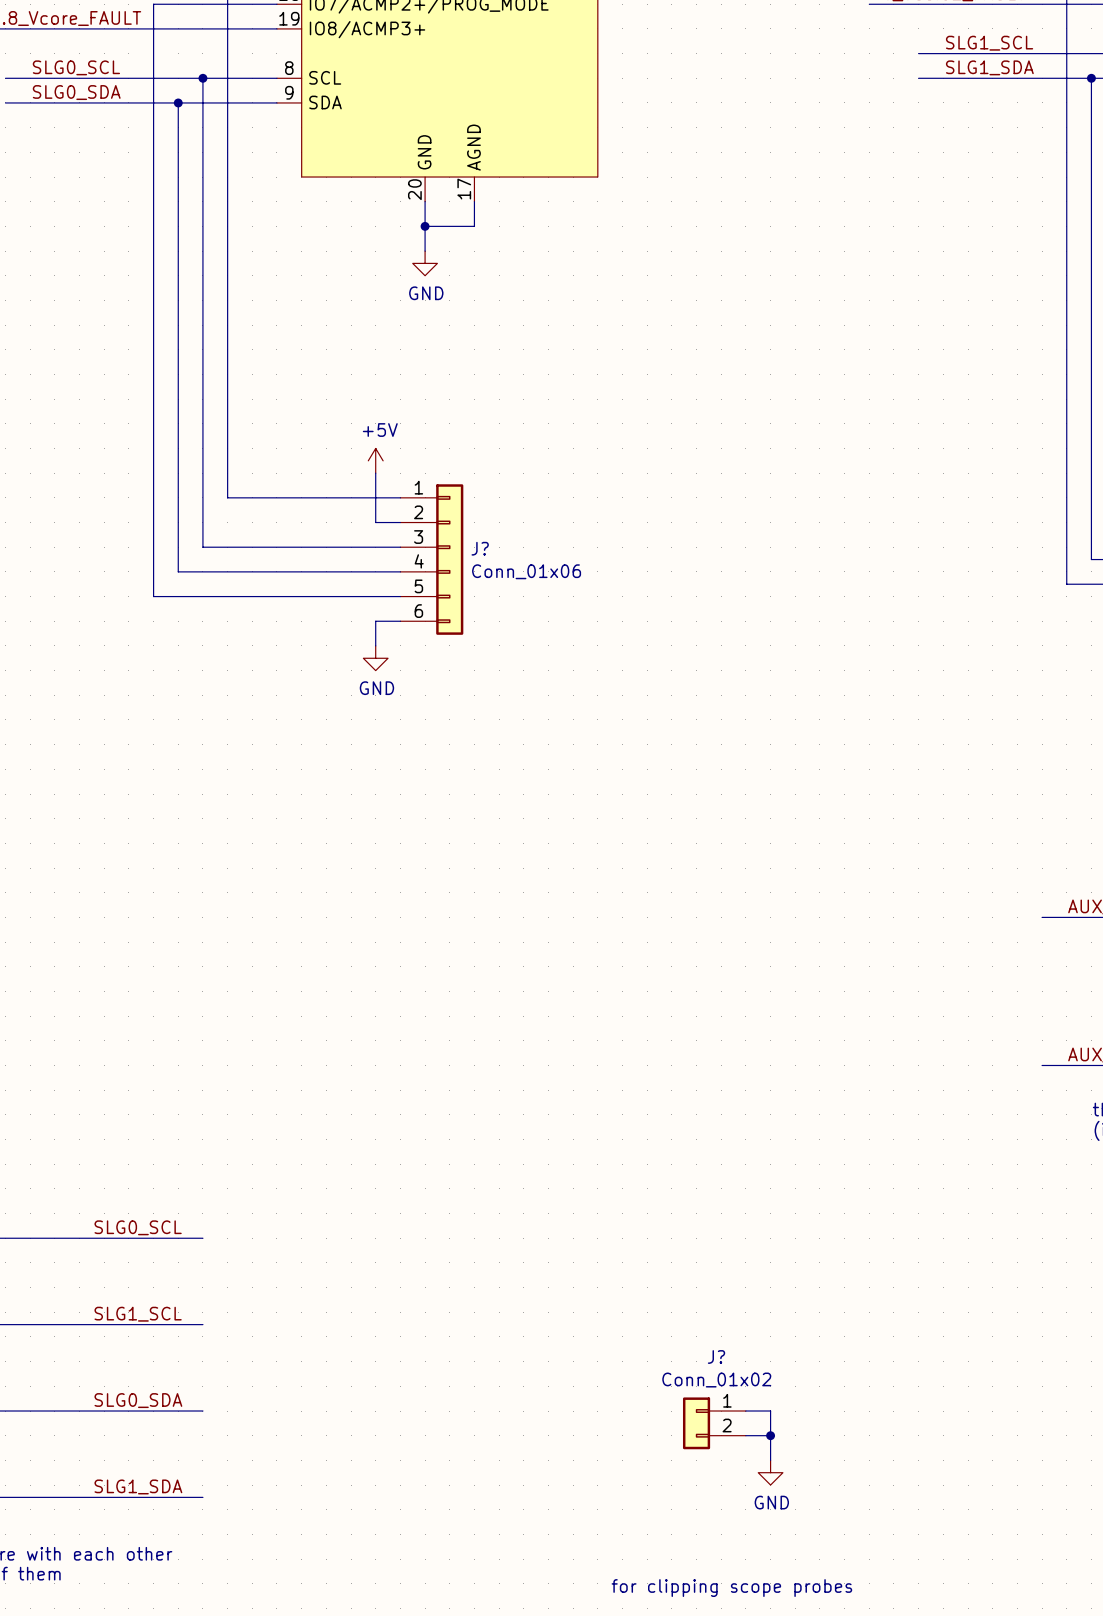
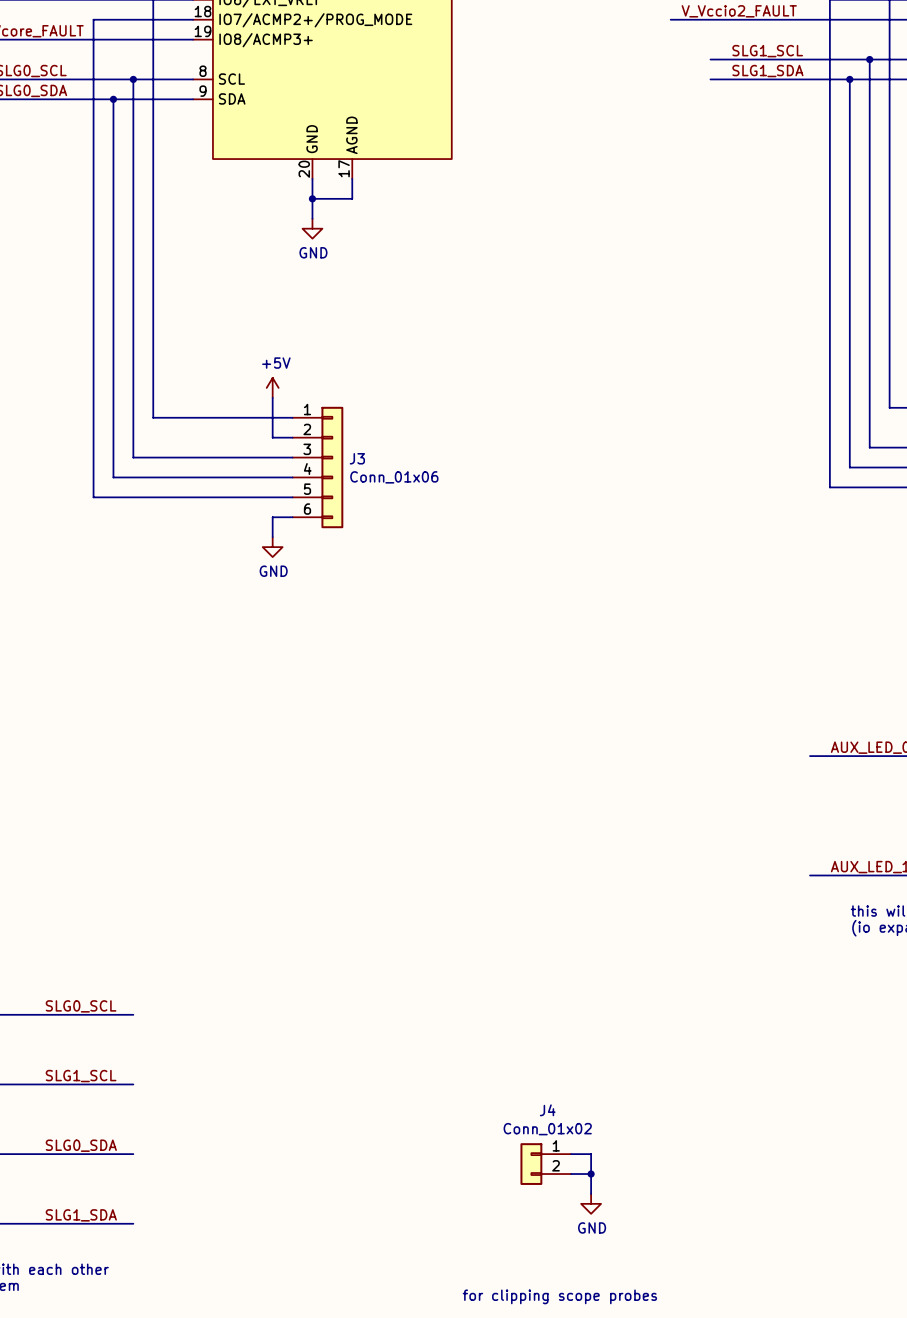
J? name: J? (480, 548) -> J3 (357, 458)
J? name: J? (716, 1356) -> J4 (547, 1110)

